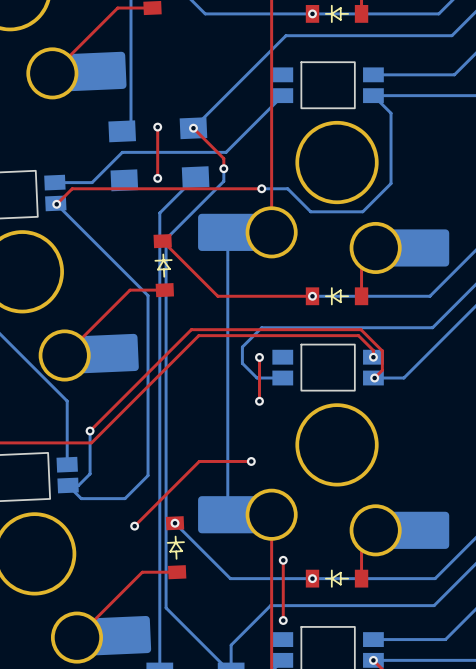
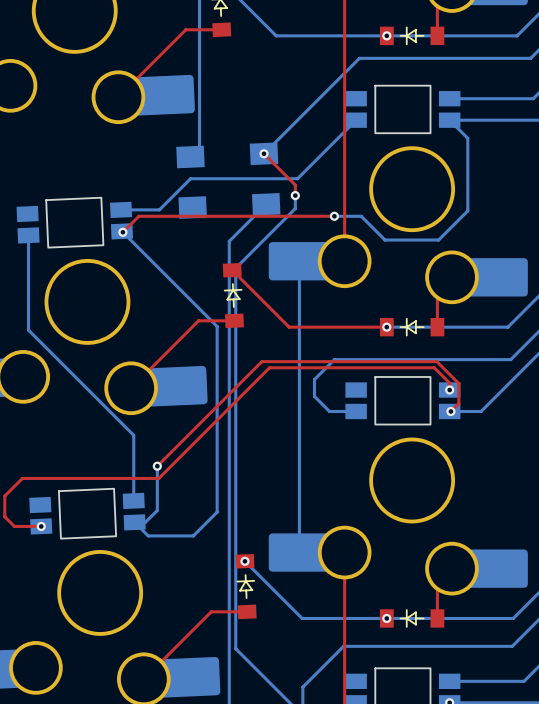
top track: (157, 127) (157, 178) -> none
via: (157, 127) -> none
via: (157, 178) -> none
top track: (259, 357) (259, 401) -> none
via: (259, 357) -> none
via: (259, 401) -> none
top track: (251, 461) (199, 461) (134, 526) -> none
via: (251, 461) -> none
via: (134, 526) -> none
top track: (283, 560) (283, 620) -> none
via: (283, 560) -> none
via: (283, 620) -> none

